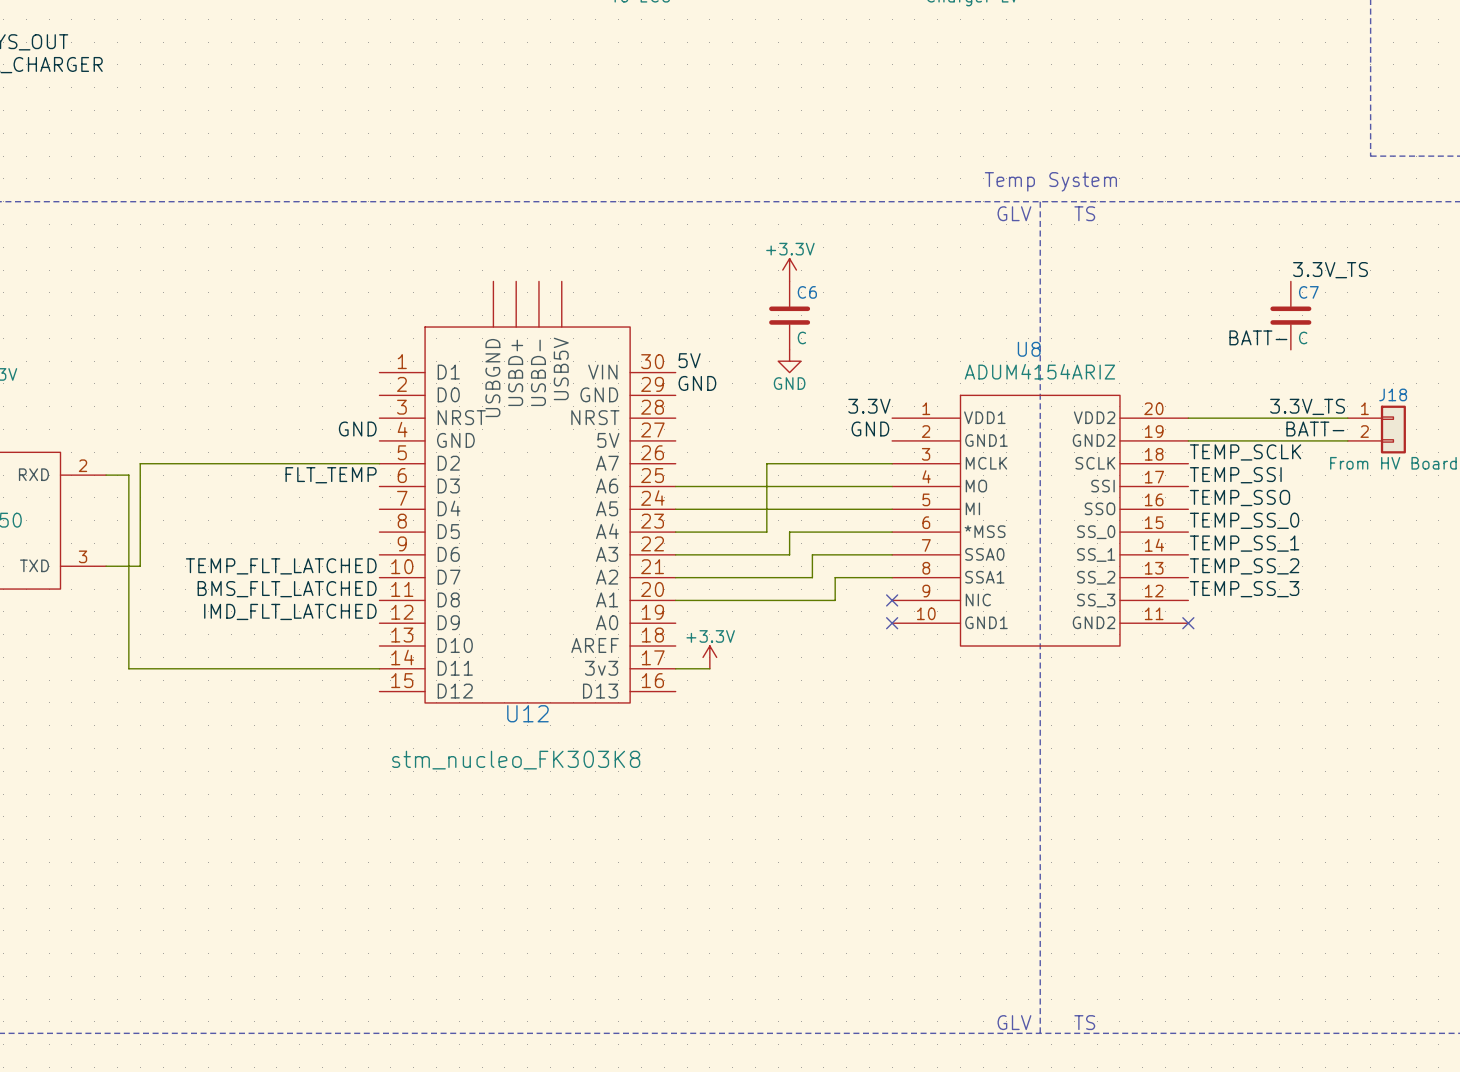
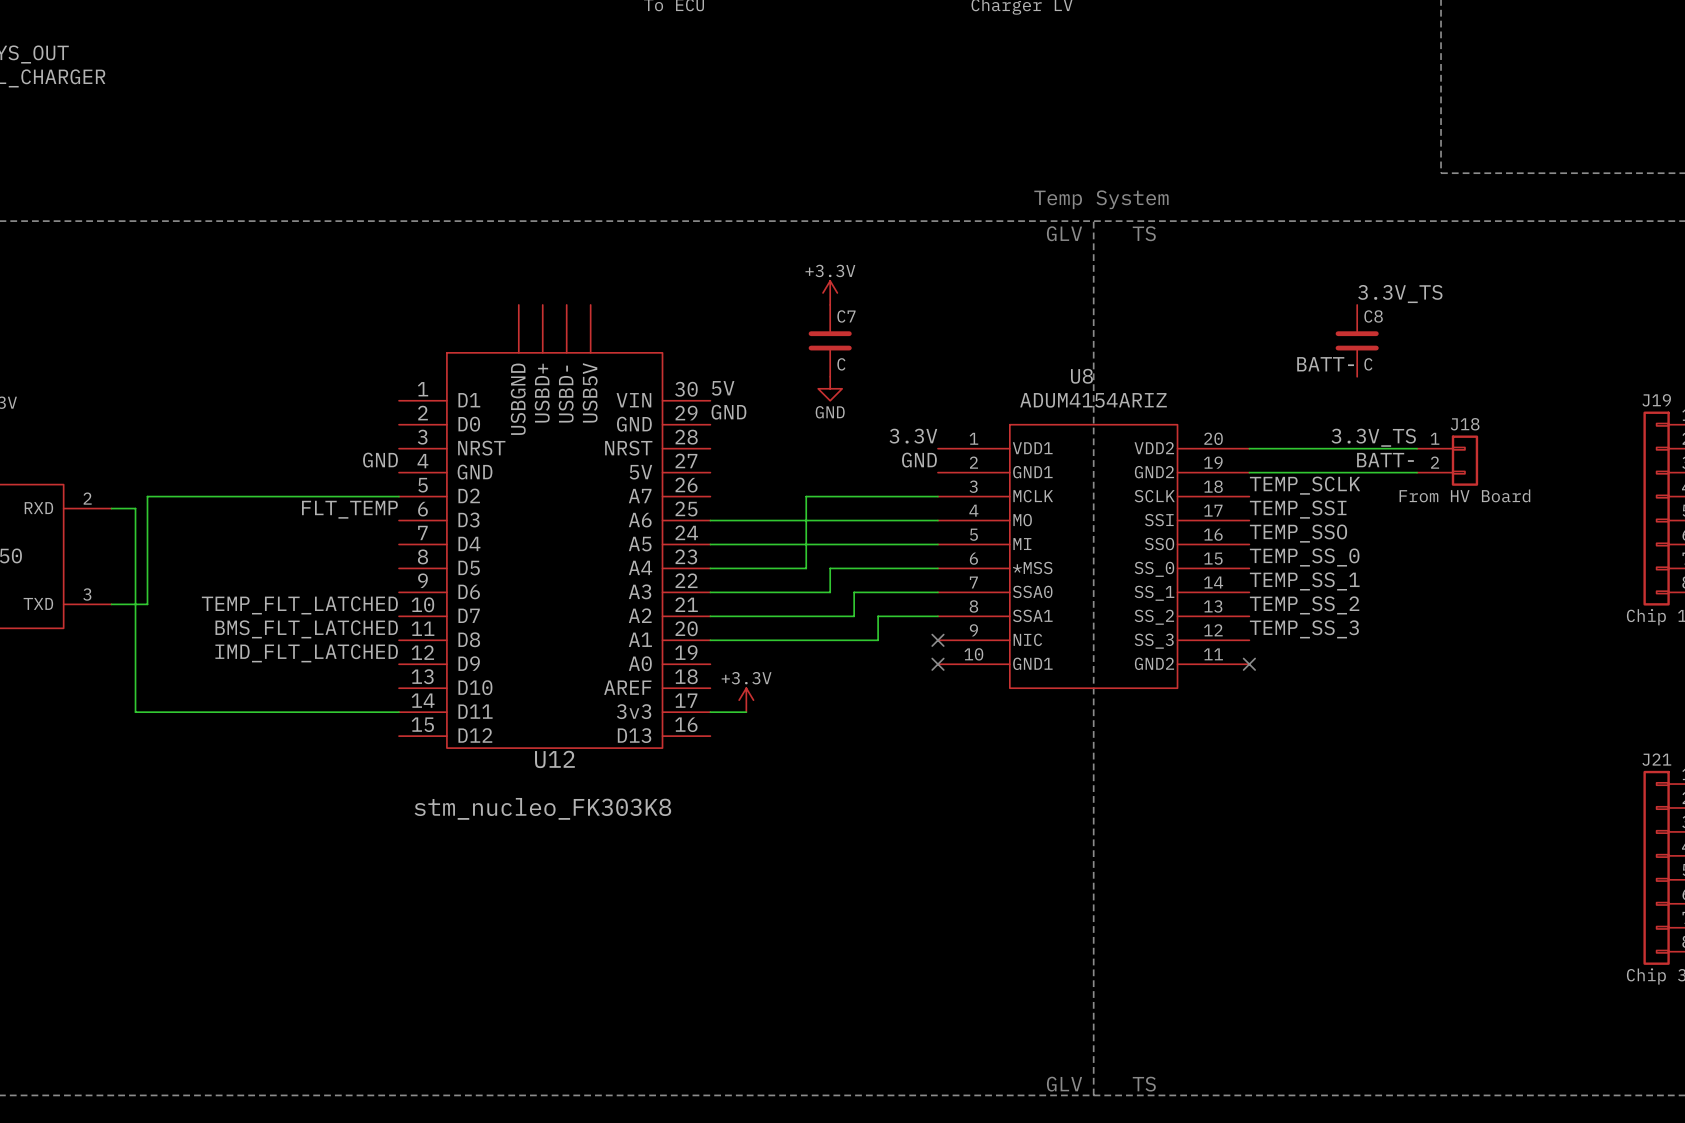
C6 name: C6 (807, 292) -> C7 (846, 316)
C7 name: C7 (1308, 292) -> C8 (1373, 316)

